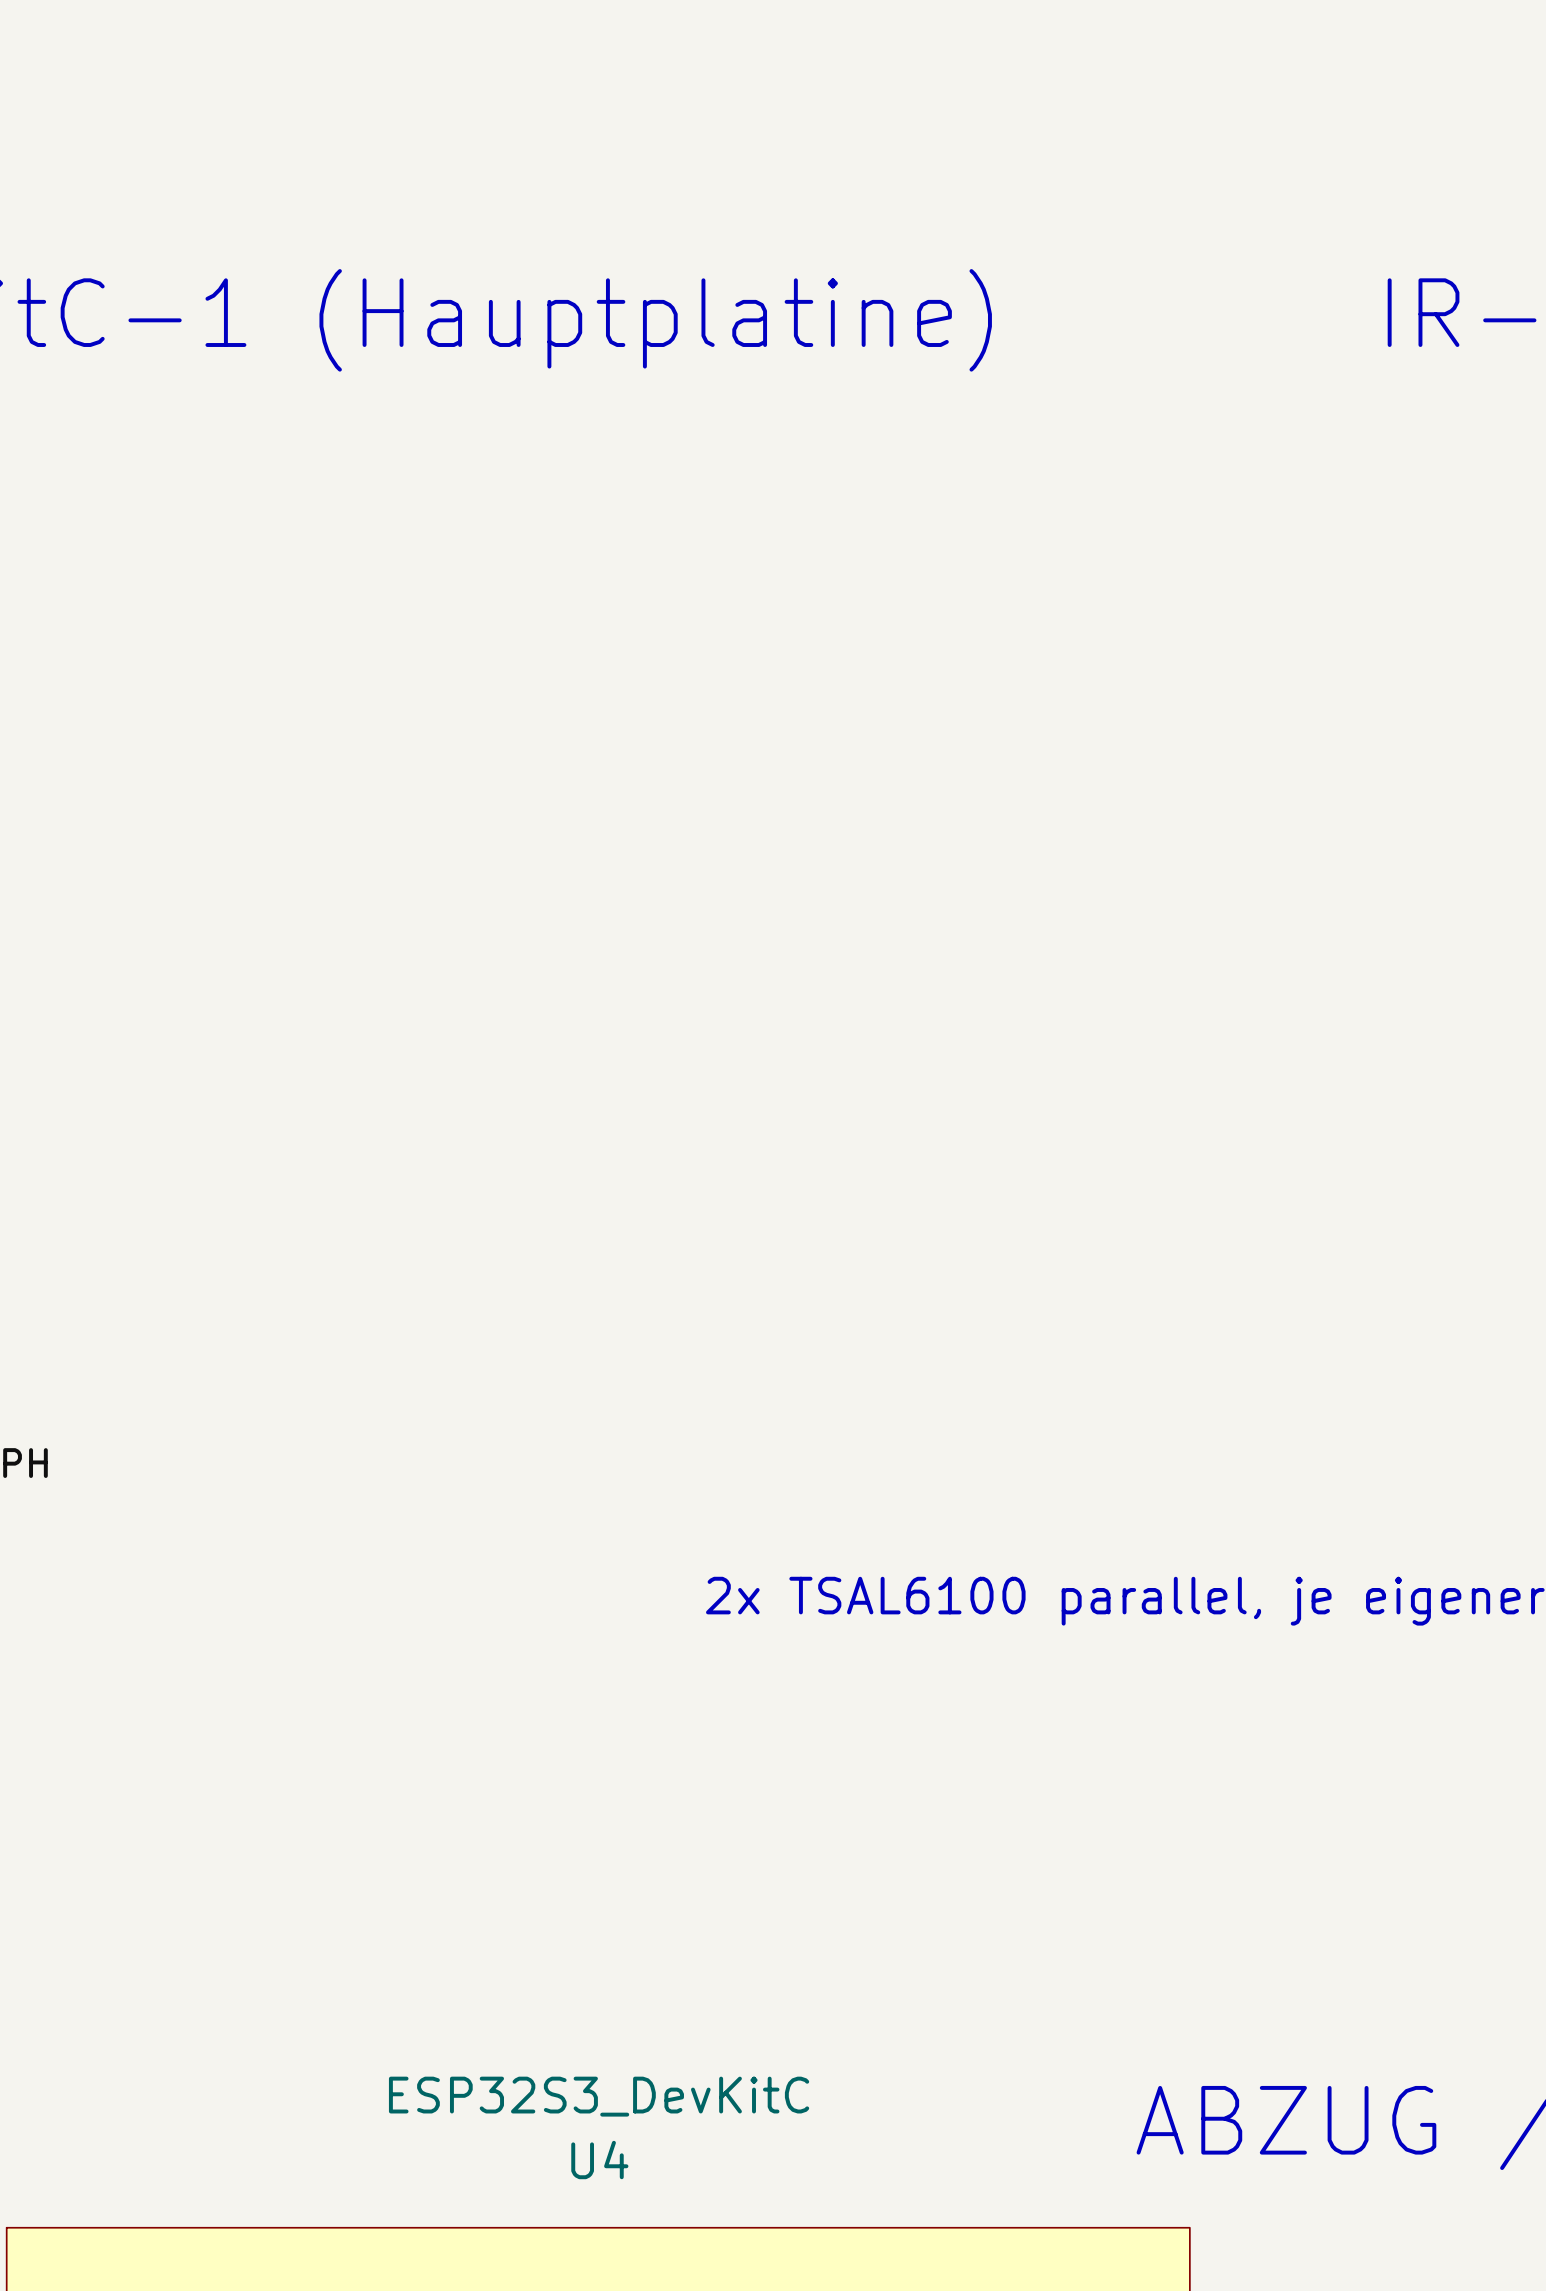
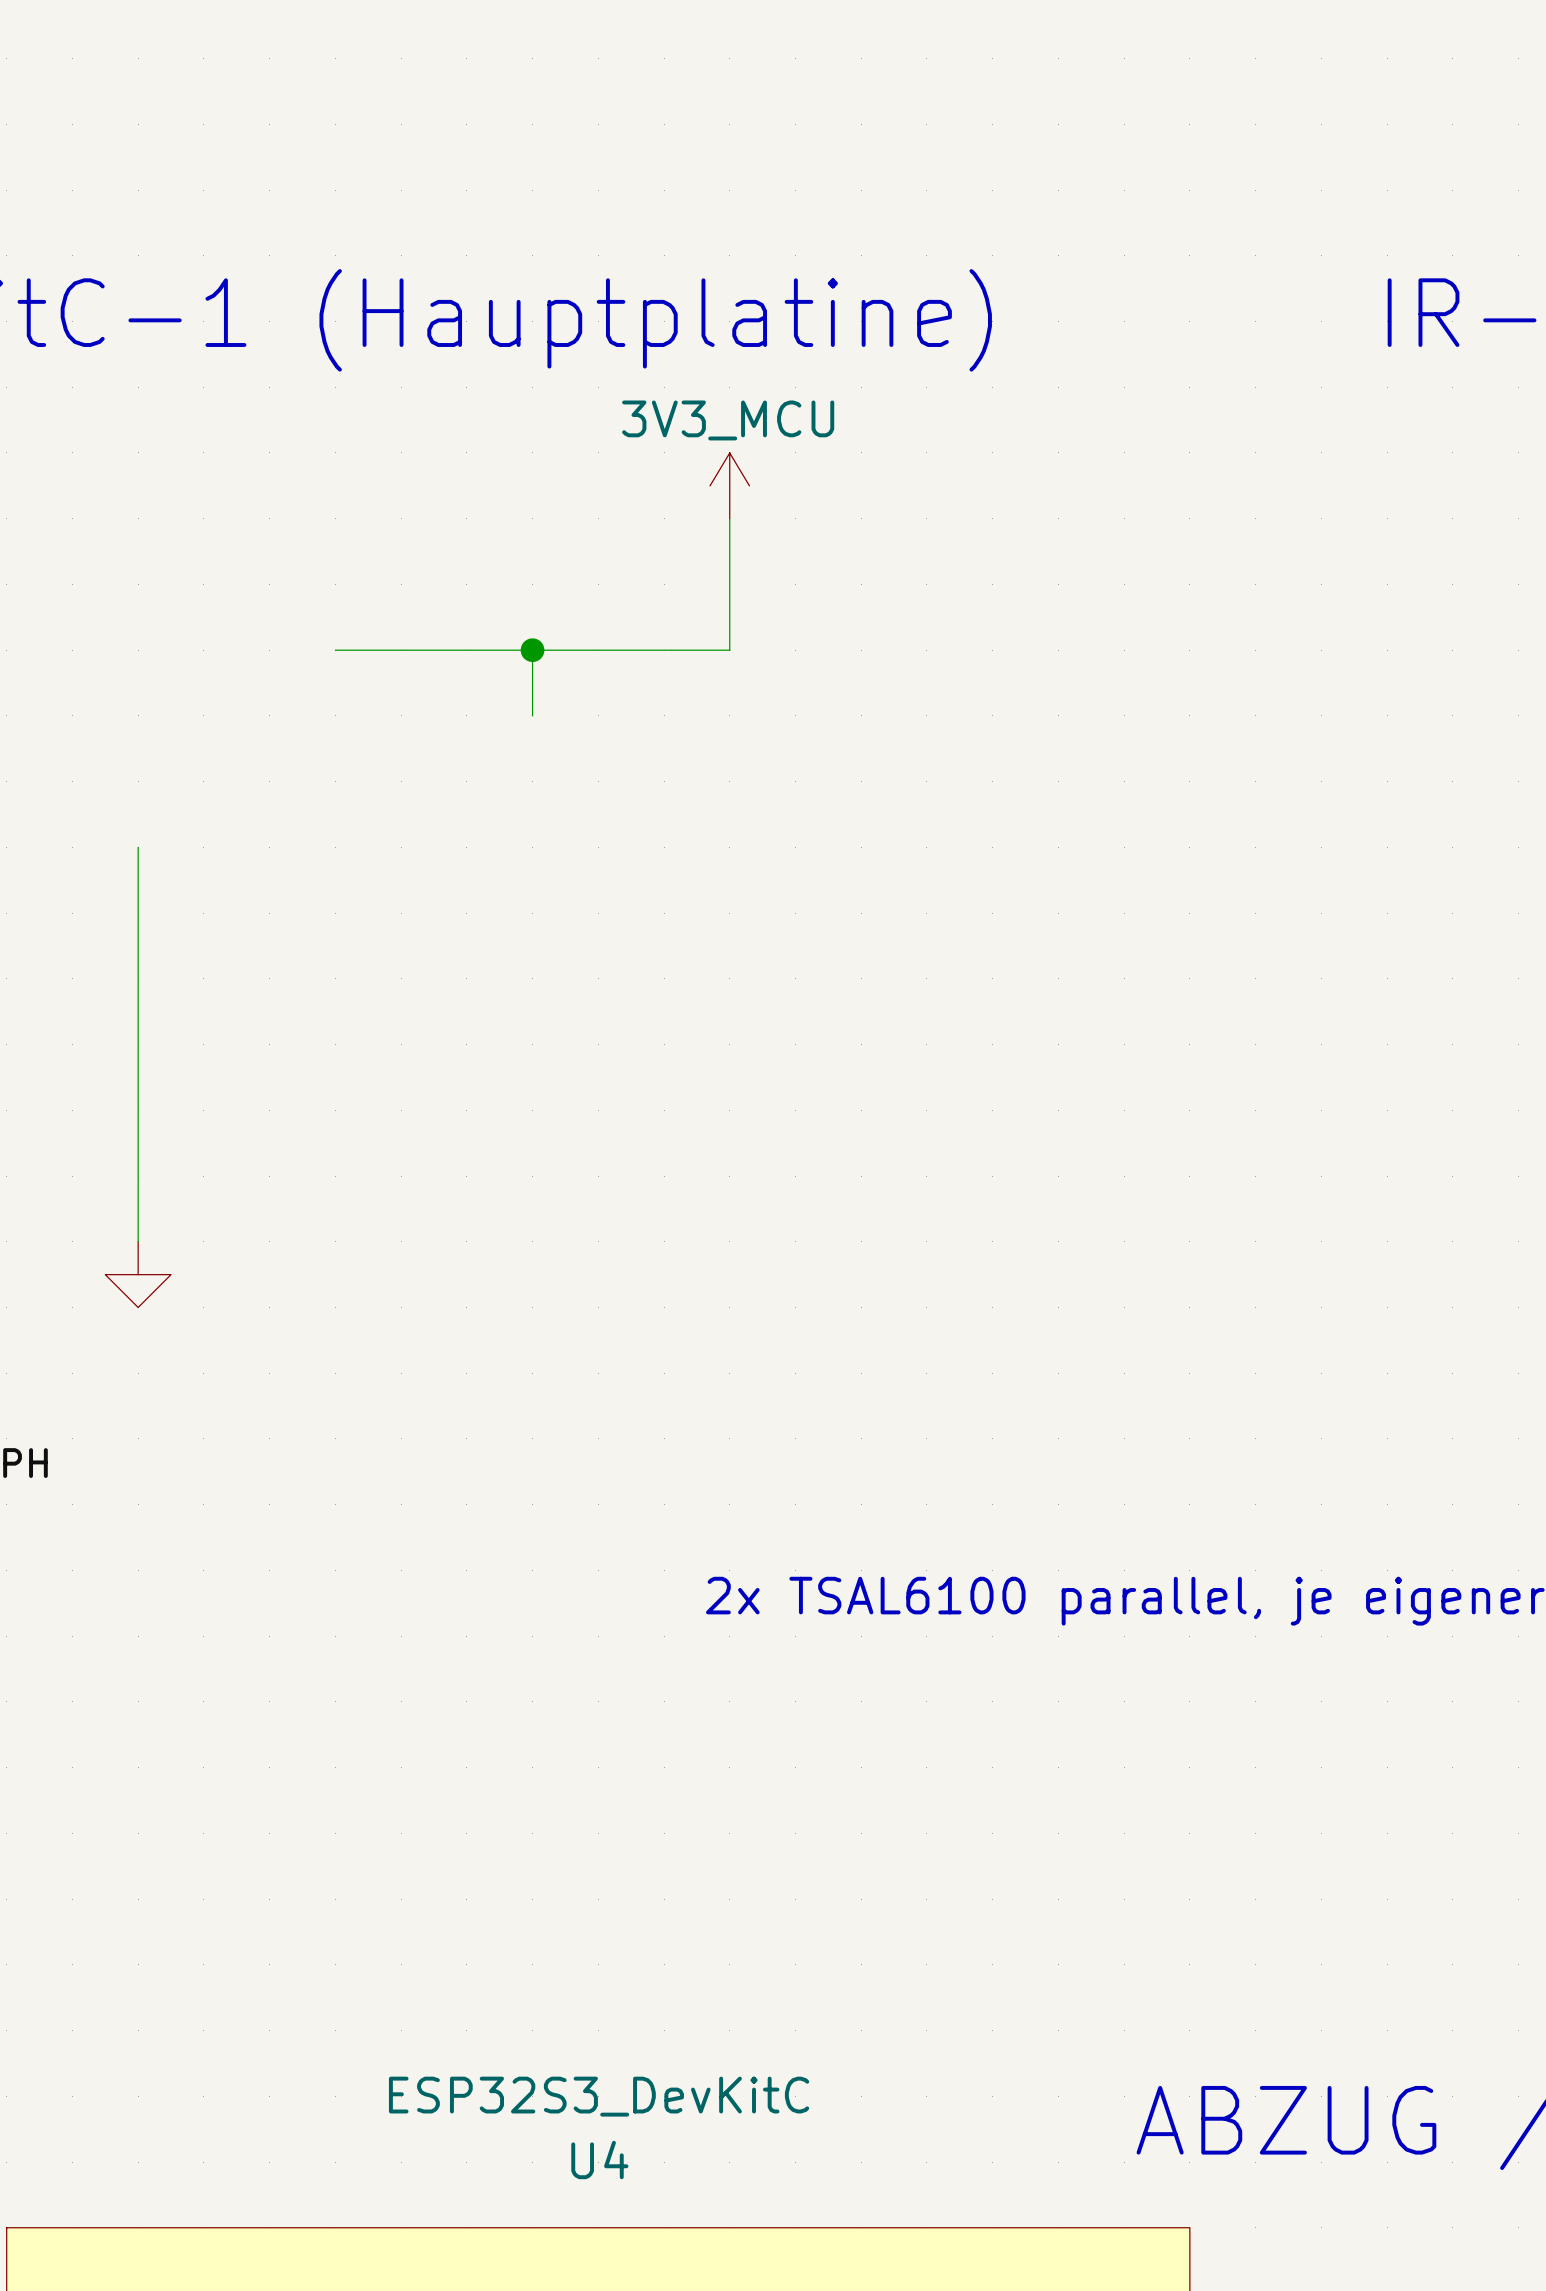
power symbol: none -> 3V3_MCU (729, 485)
wire: none -> (729, 518) (729, 650) (335, 650)
wire: none -> (532, 650) (532, 715)
junction: none -> (532, 650)
wire: none -> (138, 847) (138, 1241)
power symbol: none -> (138, 1274)

